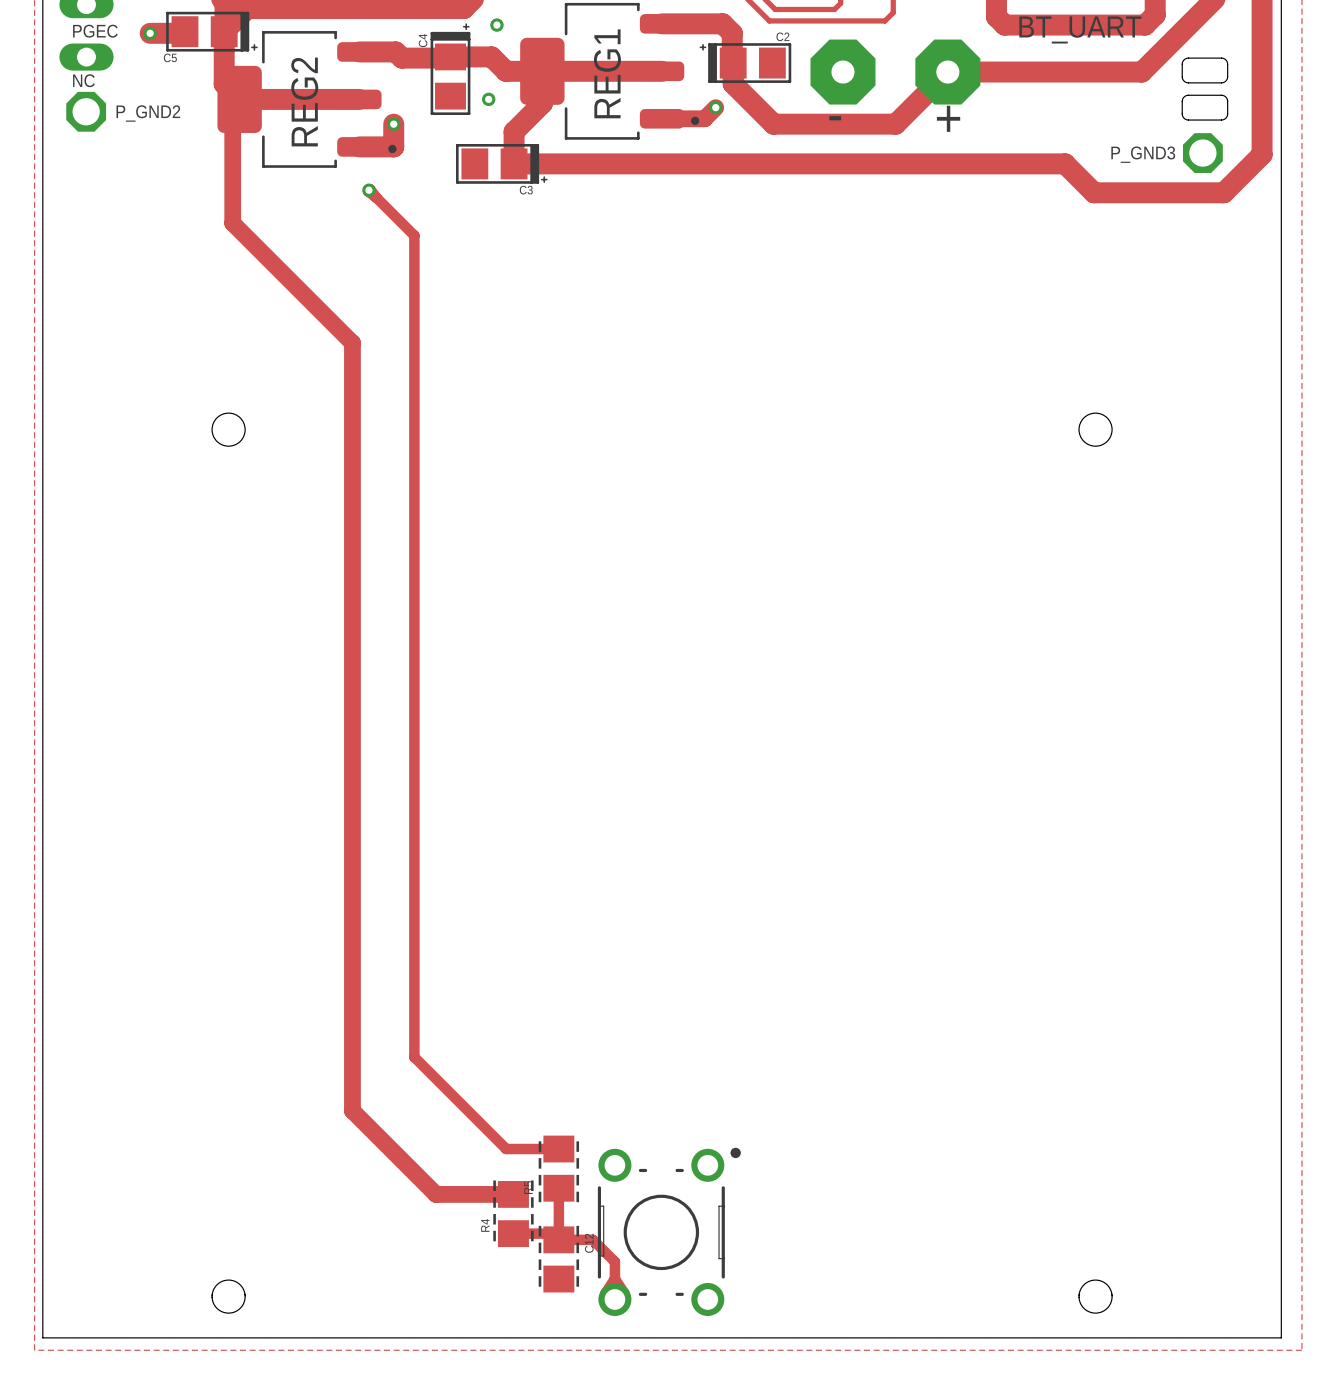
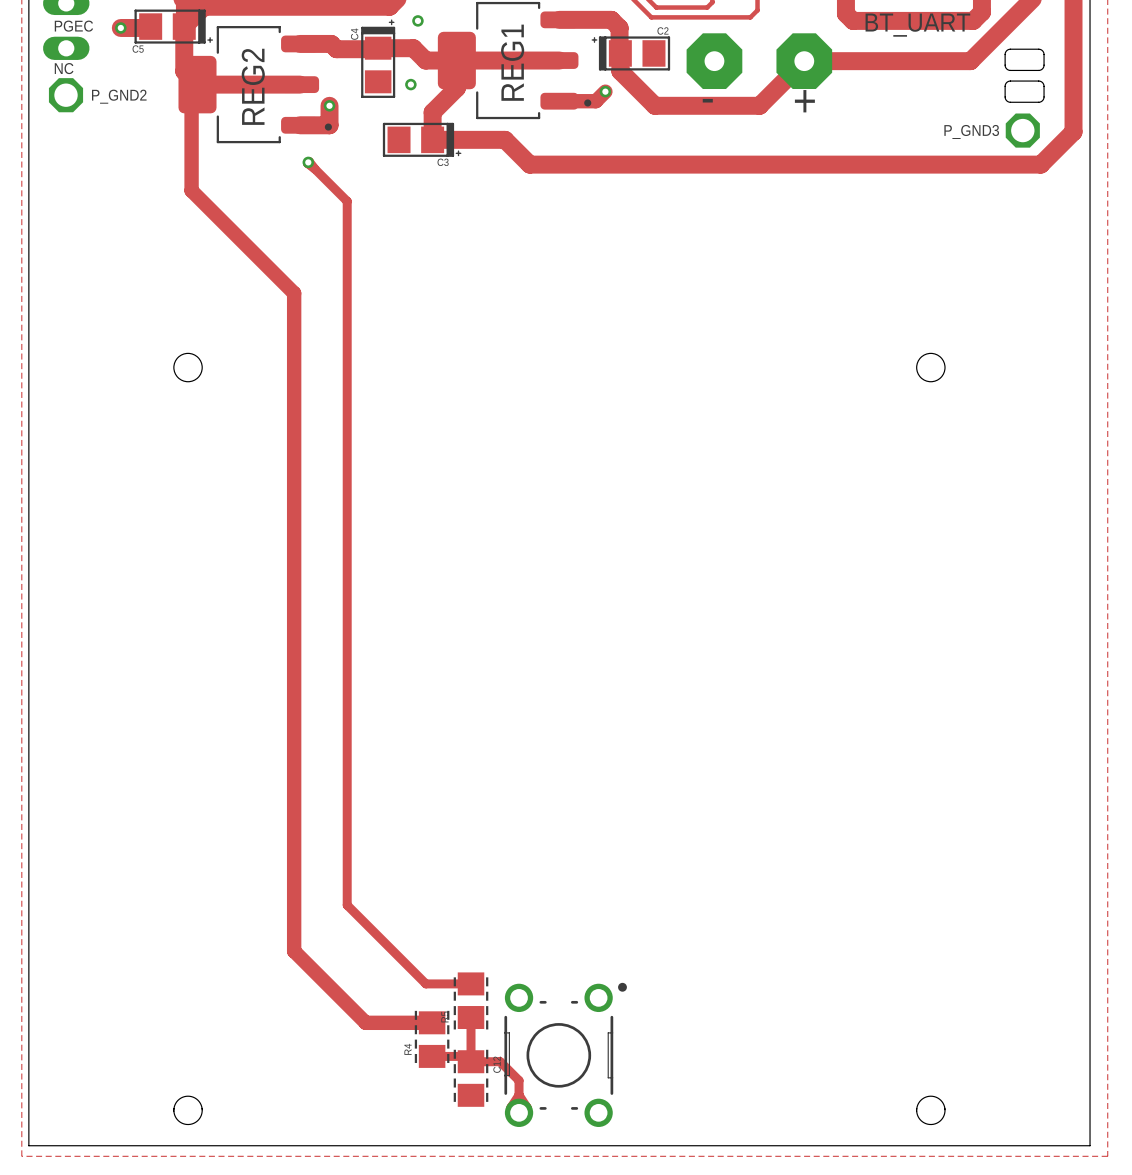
track: (598, 163) (1065, 163) (1094, 192) -> (505, 139) (529, 164) (929, 164)

